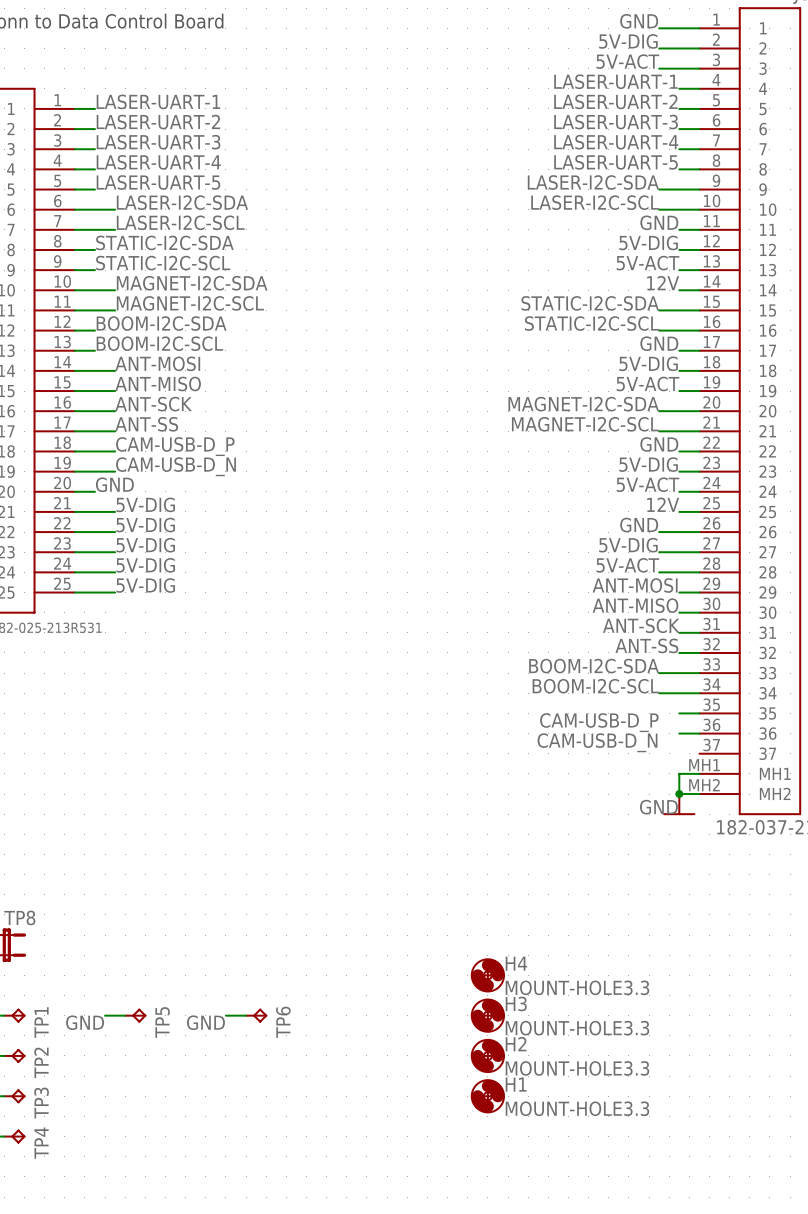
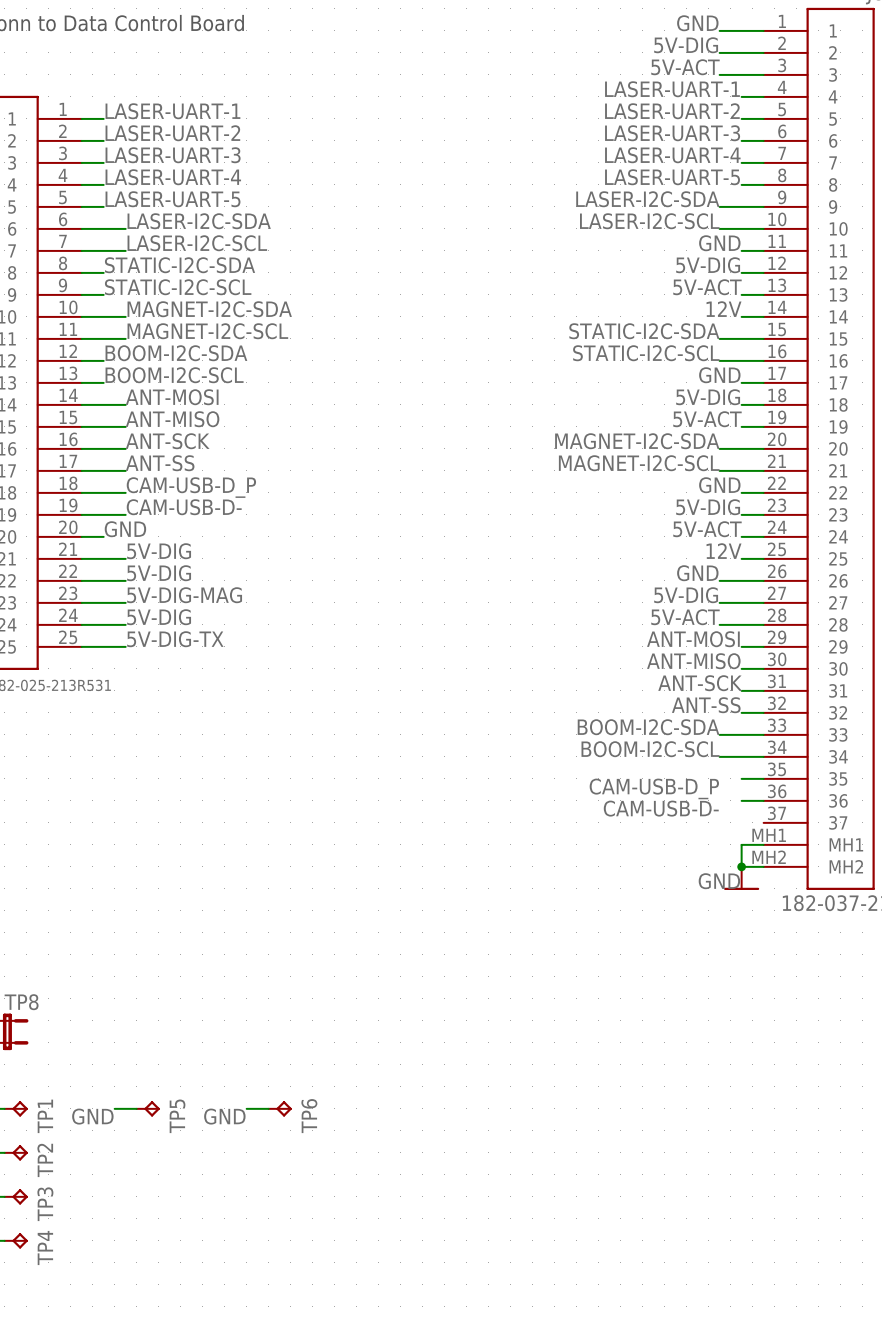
label: CAM-USB-D_N (176, 466) -> CAM-USB-D- (184, 507)
label: 5V-DIG (145, 545) -> 5V-DIG-MAG (184, 595)
label: 5V-DIG (145, 585) -> 5V-DIG-TX (175, 639)
label: CAM-USB-D_N (597, 742) -> CAM-USB-D- (661, 808)
H4: MOUNT-HOLE3.3 (487, 975) -> none
H3: MOUNT-HOLE3.3 (487, 1015) -> none
H2: MOUNT-HOLE3.3 (487, 1055) -> none
H1: MOUNT-HOLE3.3 (487, 1096) -> none

